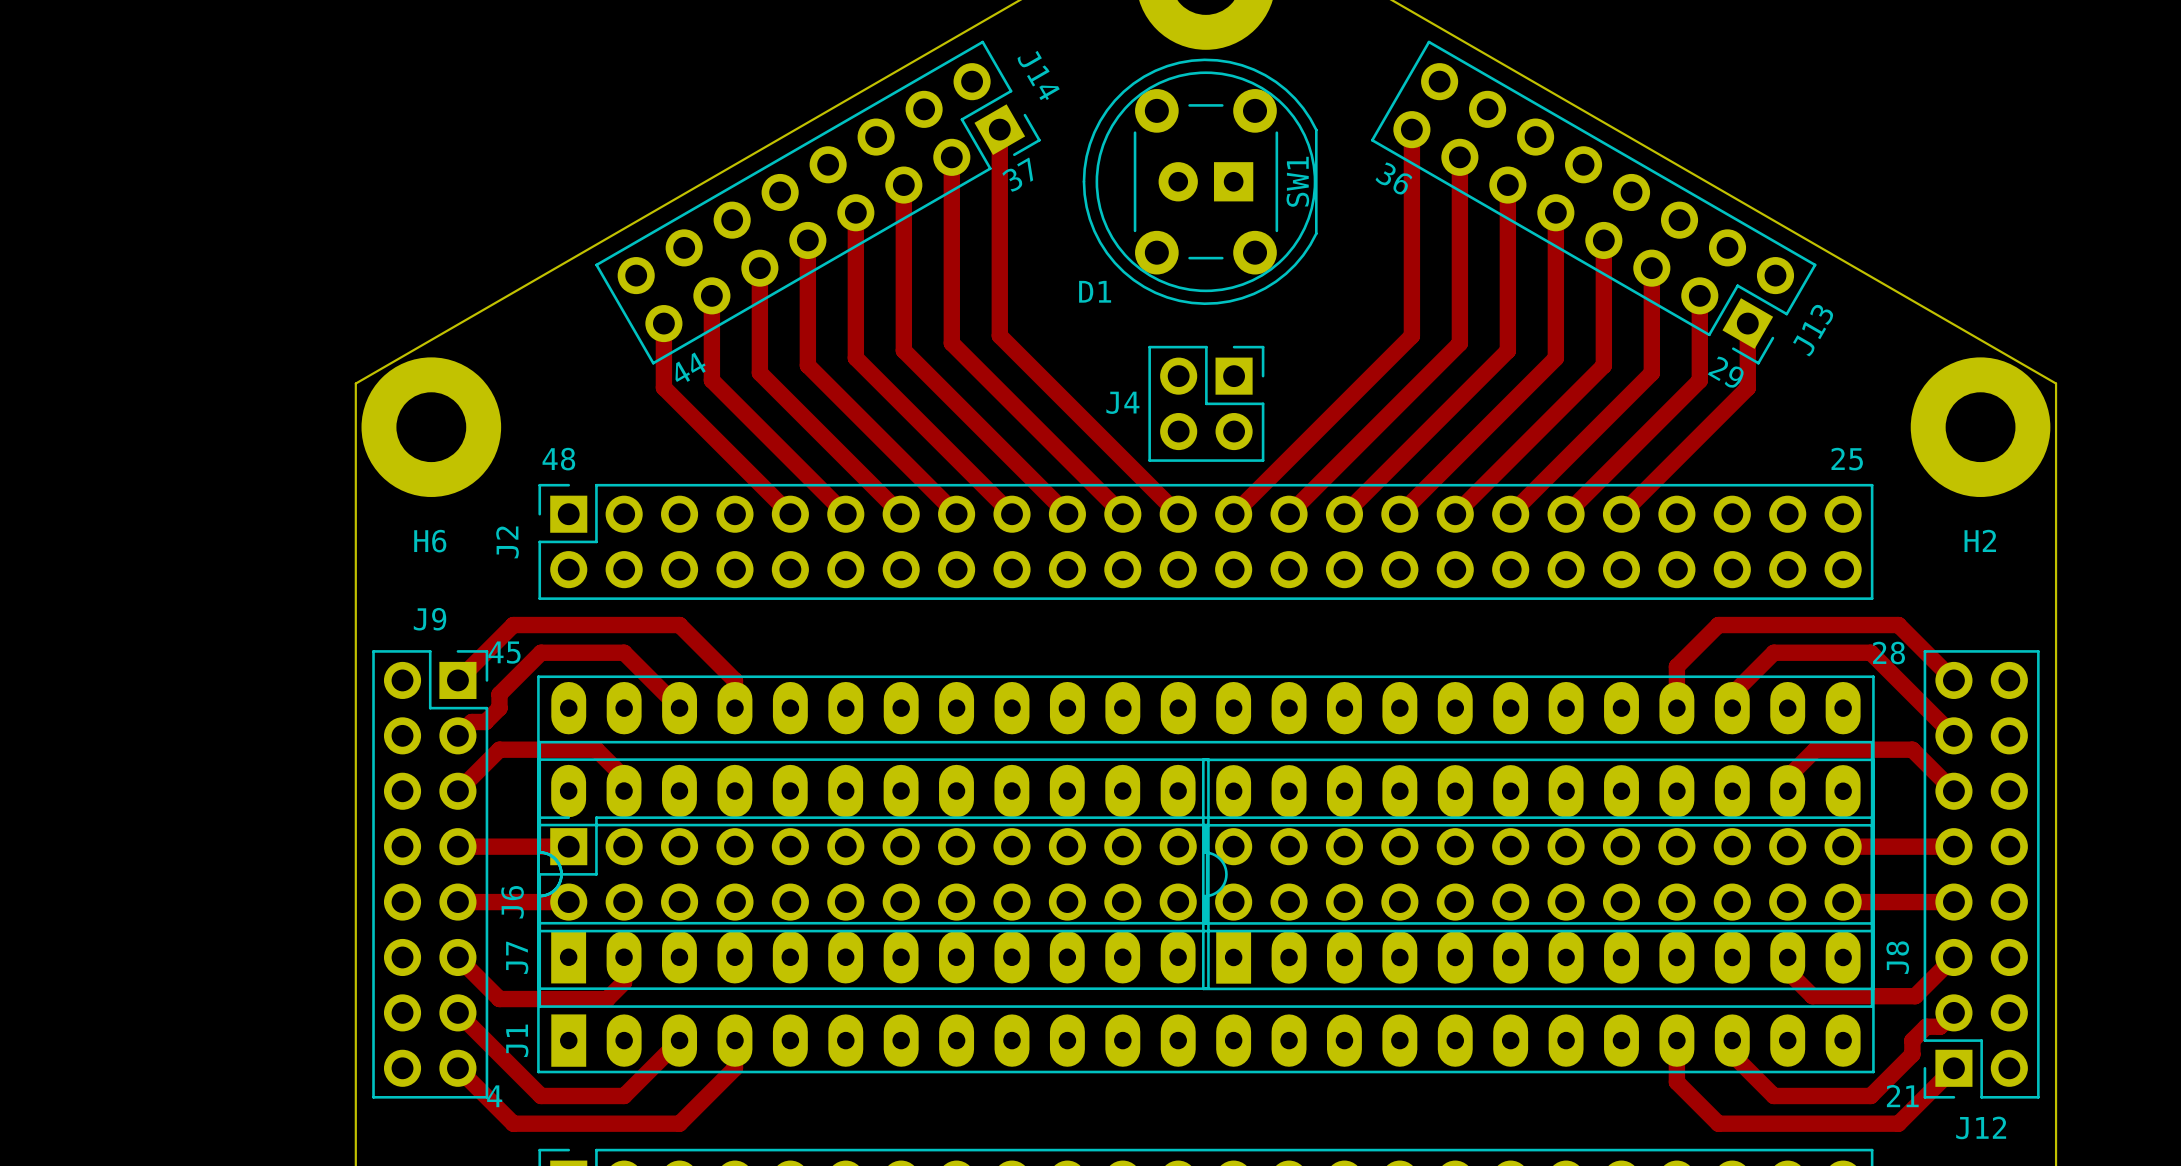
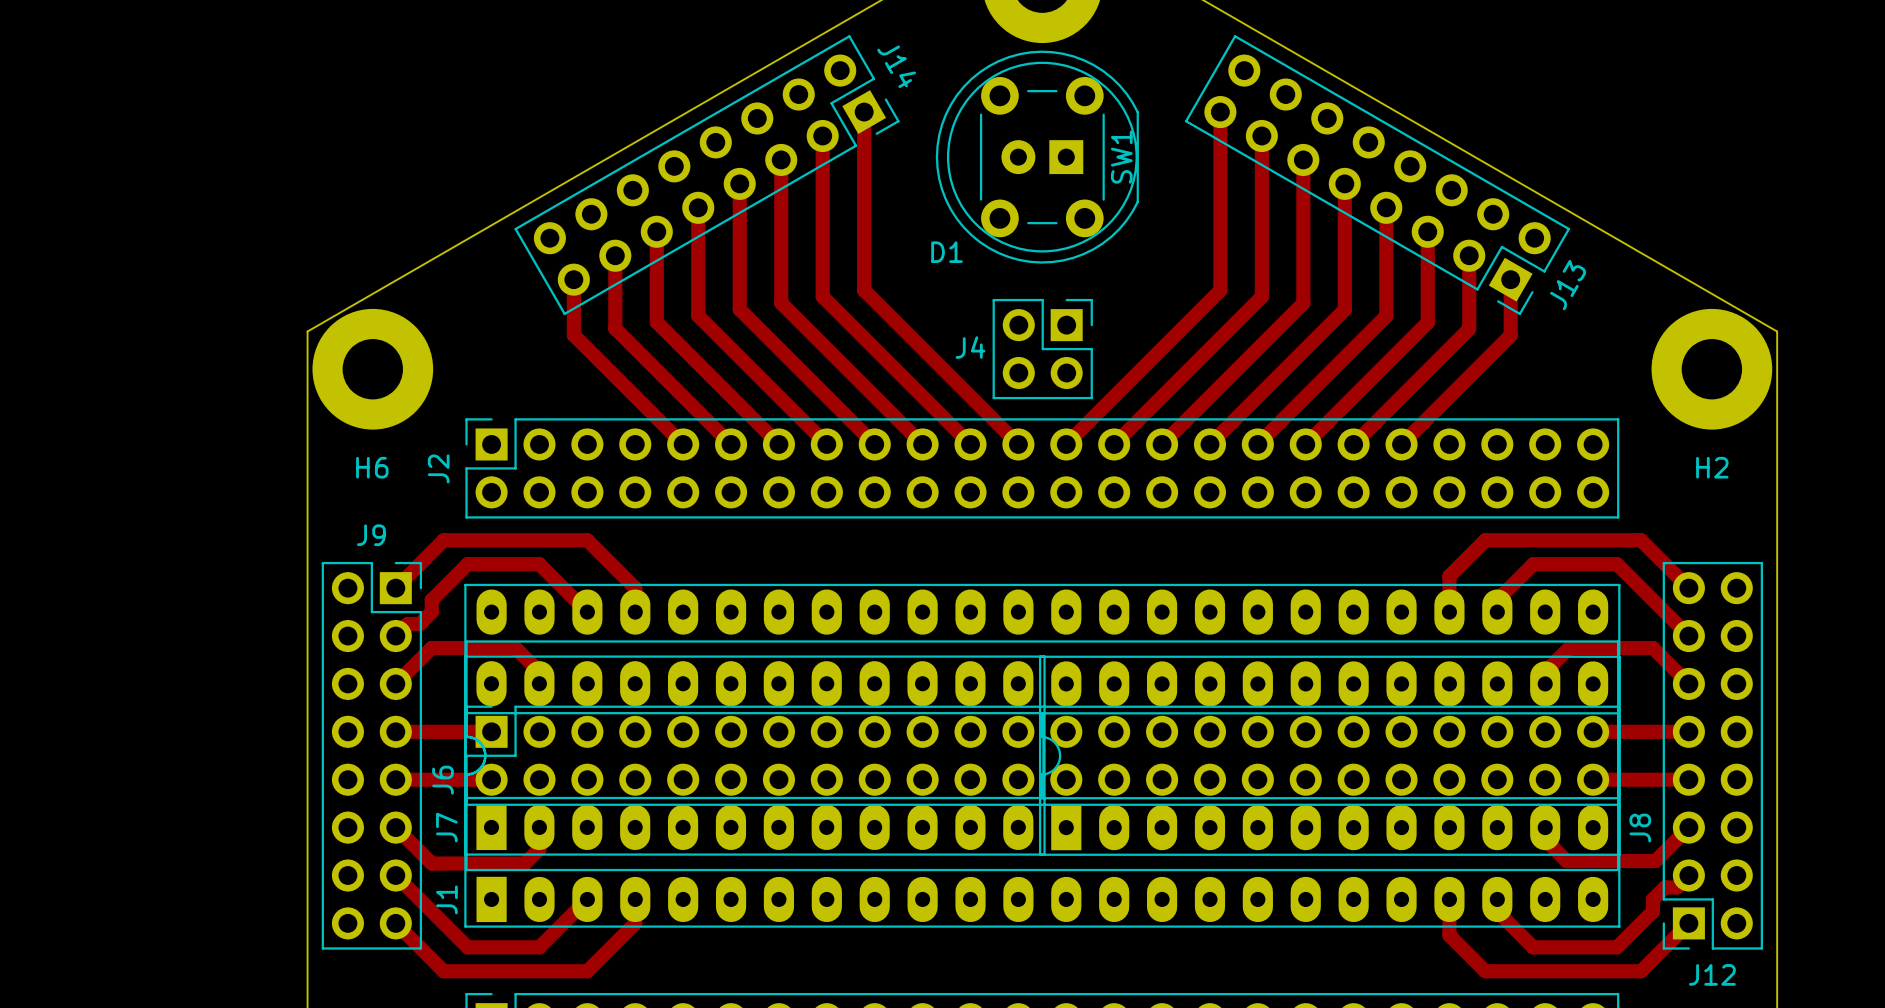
text: 37 (1017, 174) -> none
text: 36 (1393, 178) -> none
text: 44 (690, 367) -> none
text: 29 (1725, 372) -> none
text: 48 (558, 459) -> none
text: 25 (1847, 459) -> none
text: 45 (504, 652) -> none
text: 28 (1888, 653) -> none
text: 4 (494, 1096) -> none
text: 21 (1902, 1096) -> none

